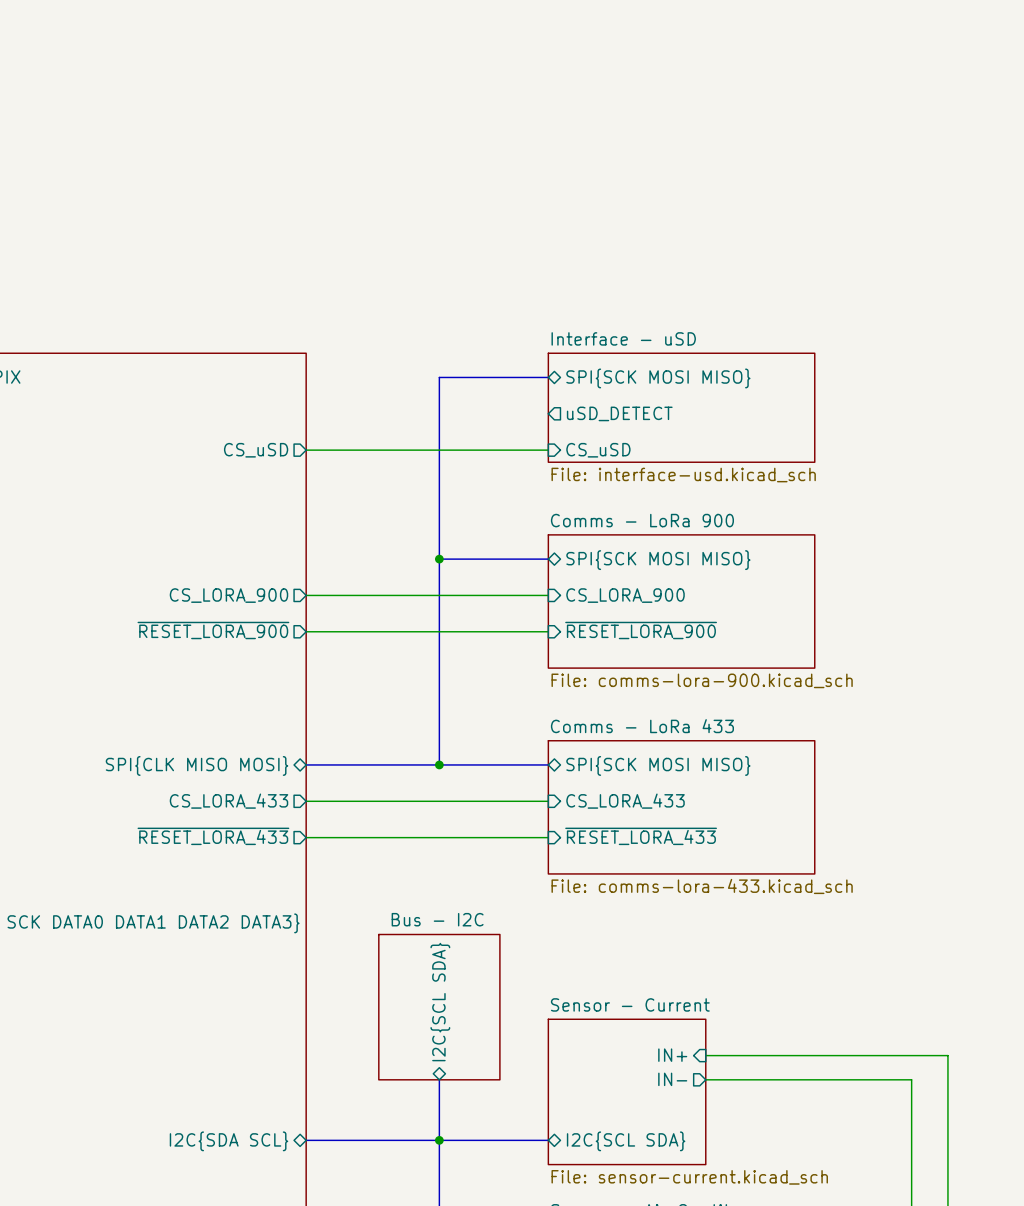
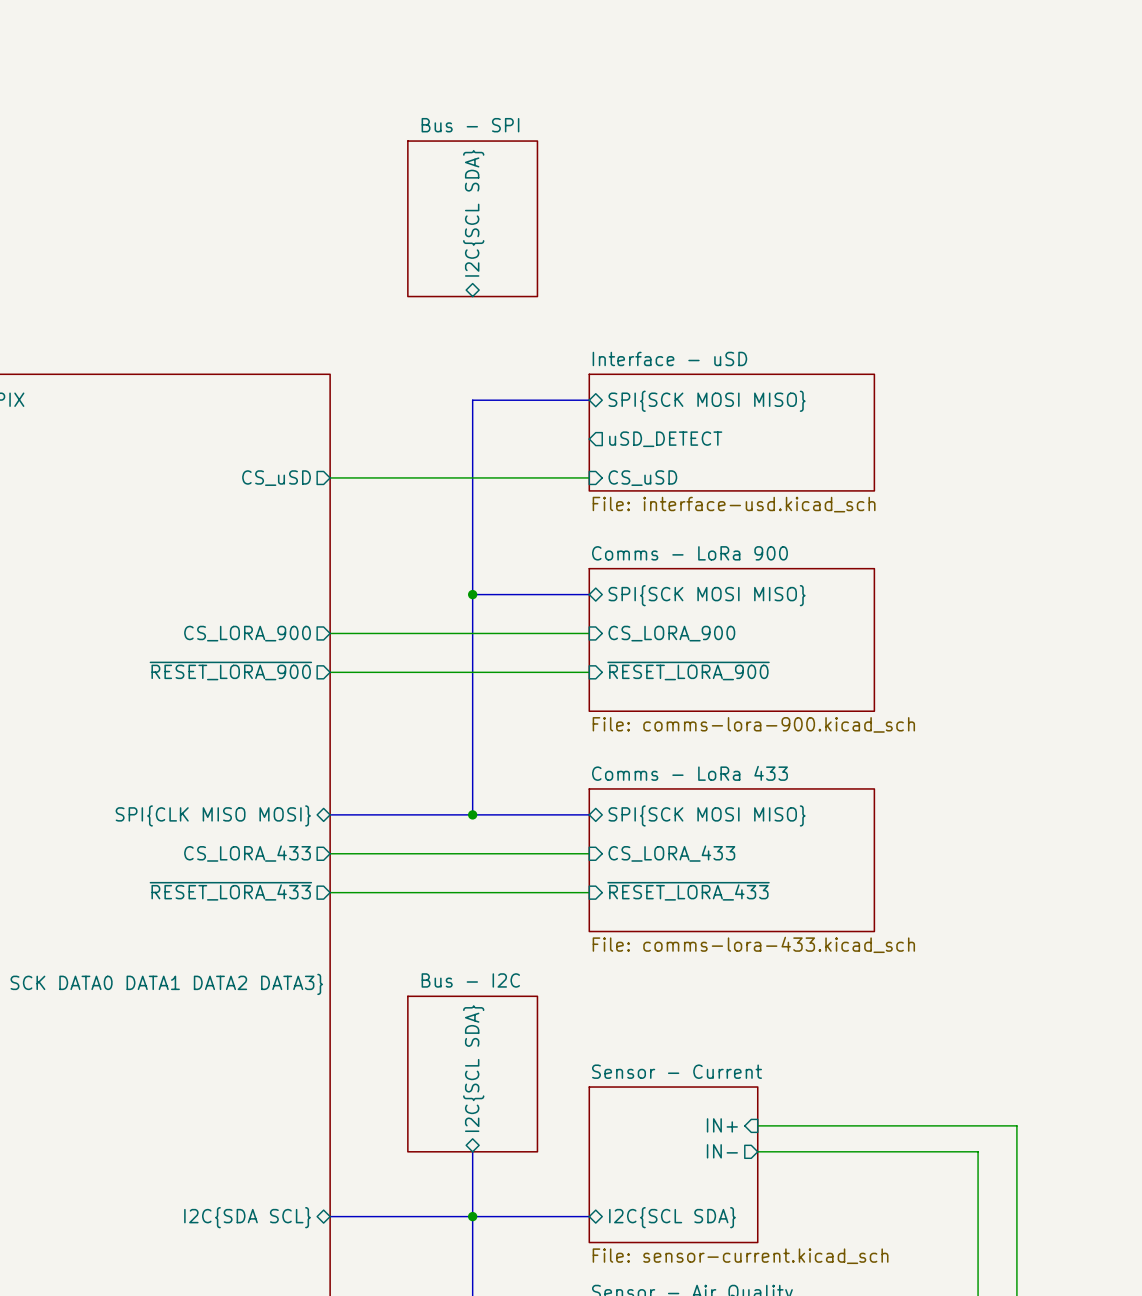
sheet pin: none -> I2C{SCL SDA} (473, 213)
sheet Bus - SPI: none -> (472, 218)

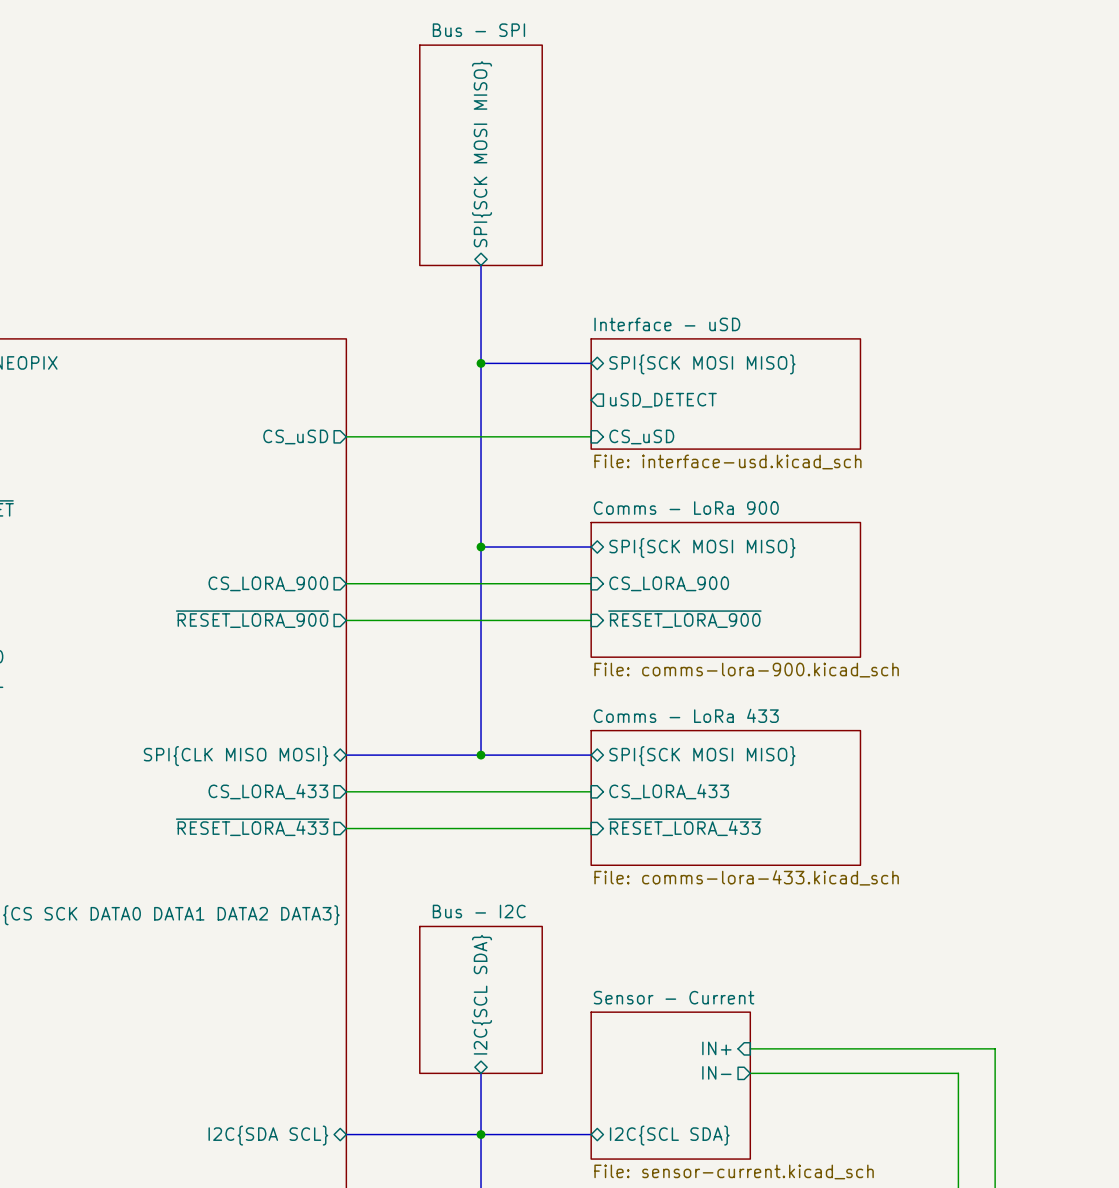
sheet Bus - SPI: none -> (481, 155)
sheet pin: I2C{SCL SDA} (473, 213) -> SPI{SCK MOSI MISO} (482, 154)
sheet Bus - SPI: (472, 218) -> none
bus: none -> (481, 265) (481, 363)
junction: none -> (481, 363)

